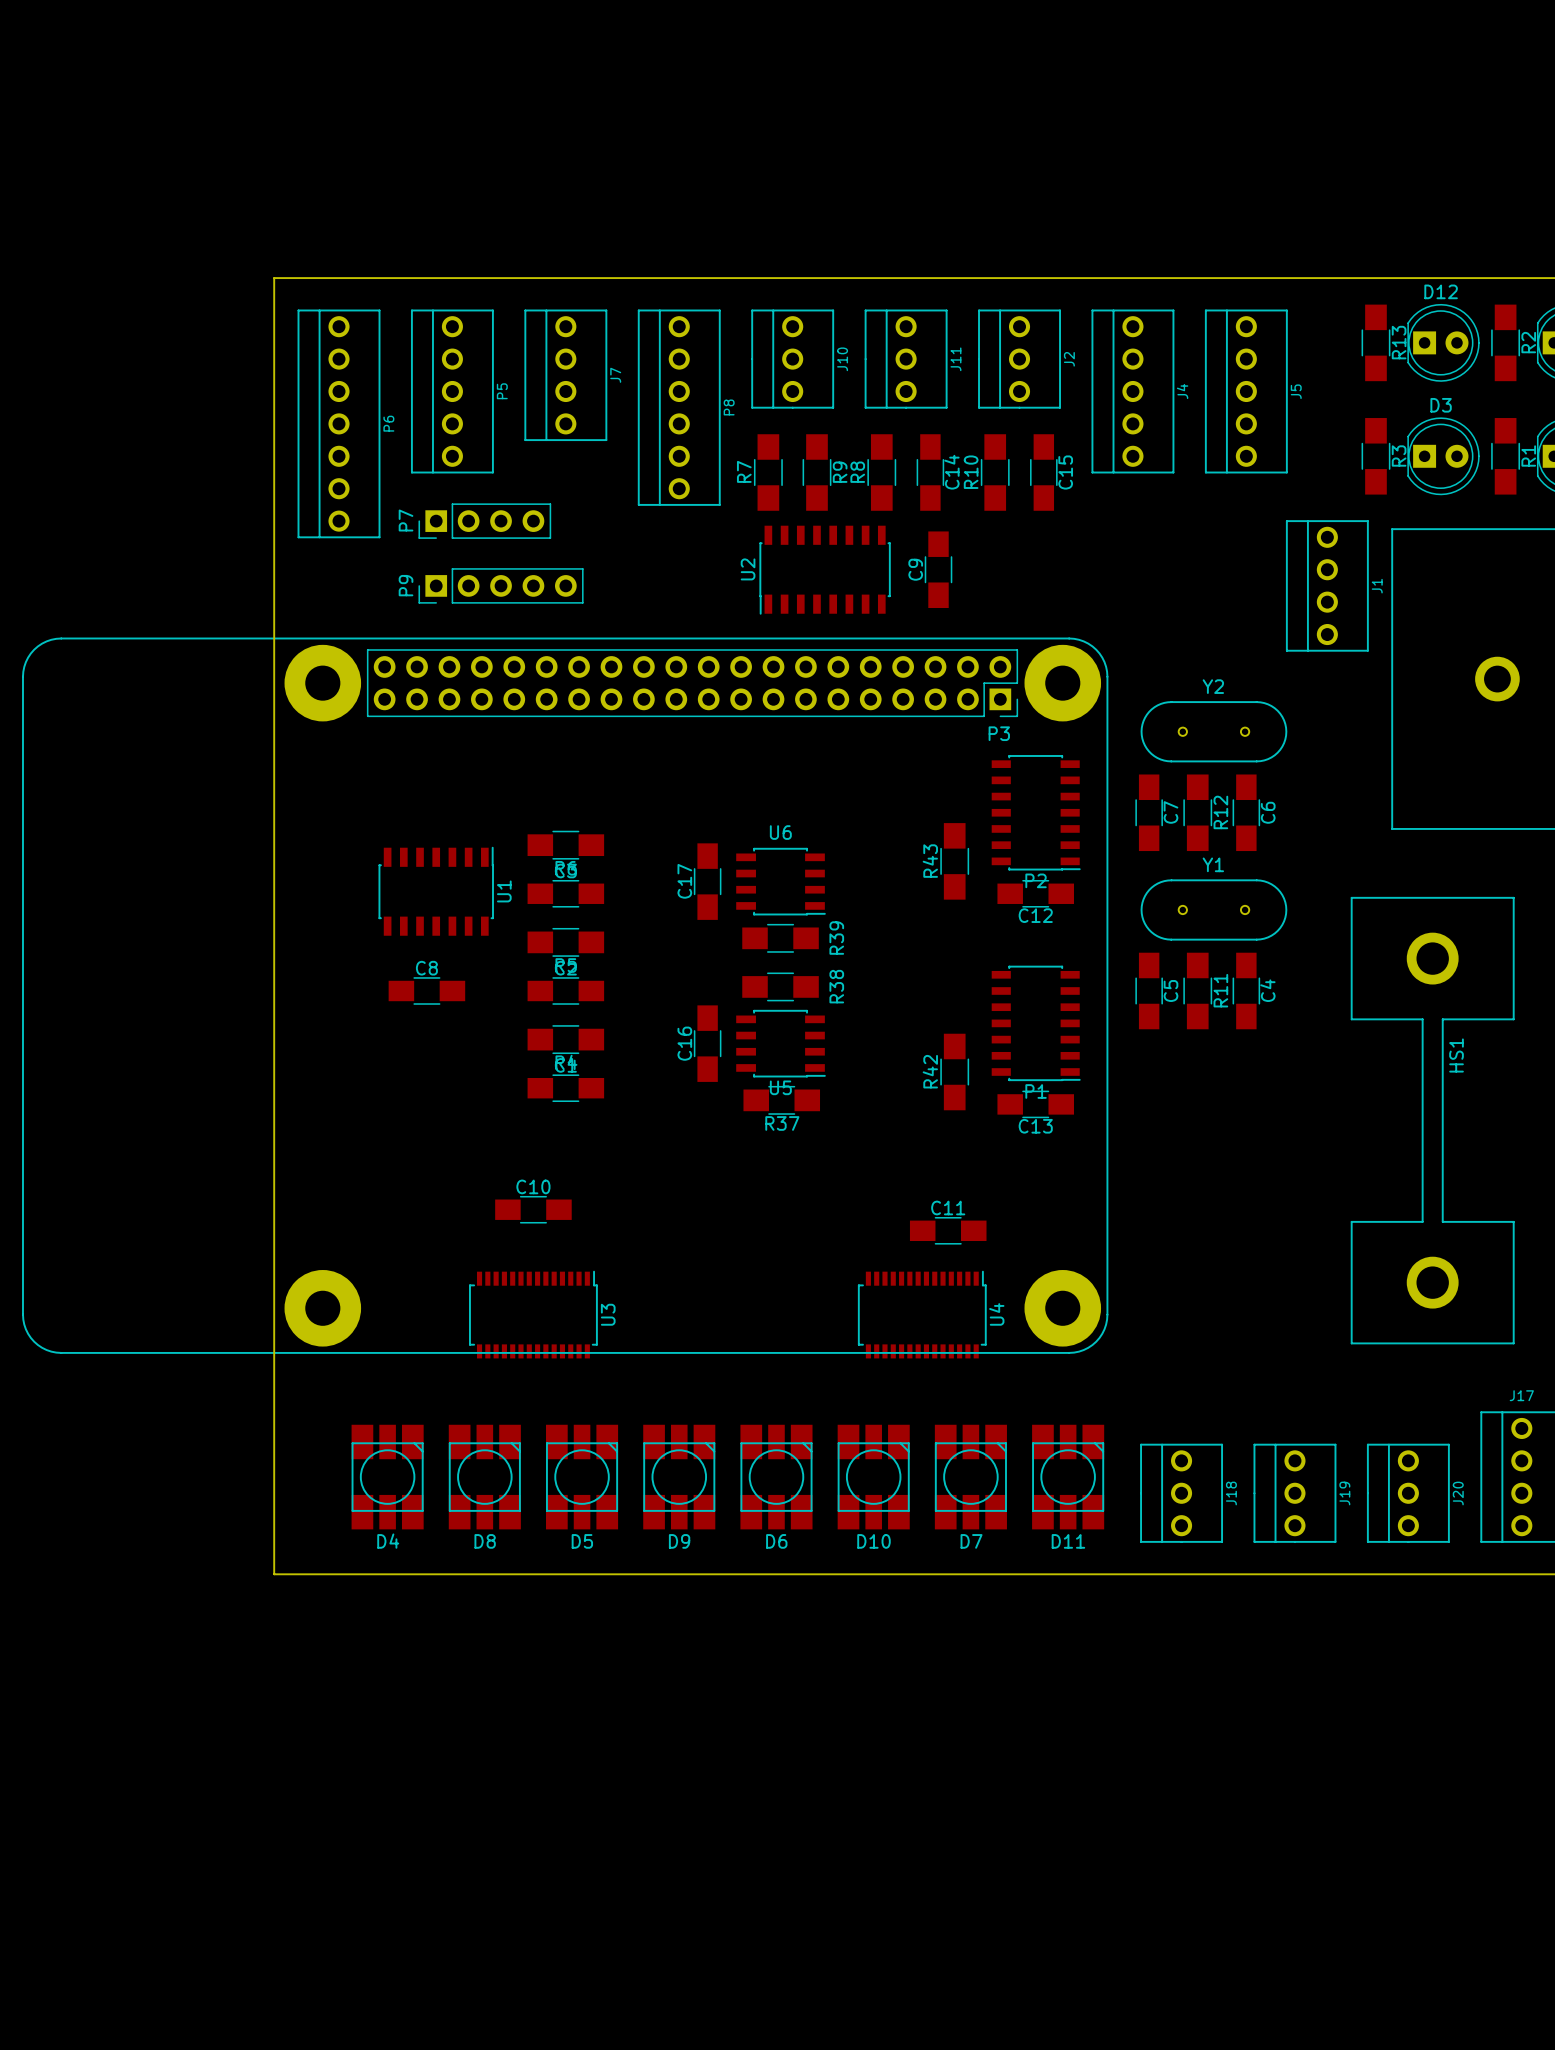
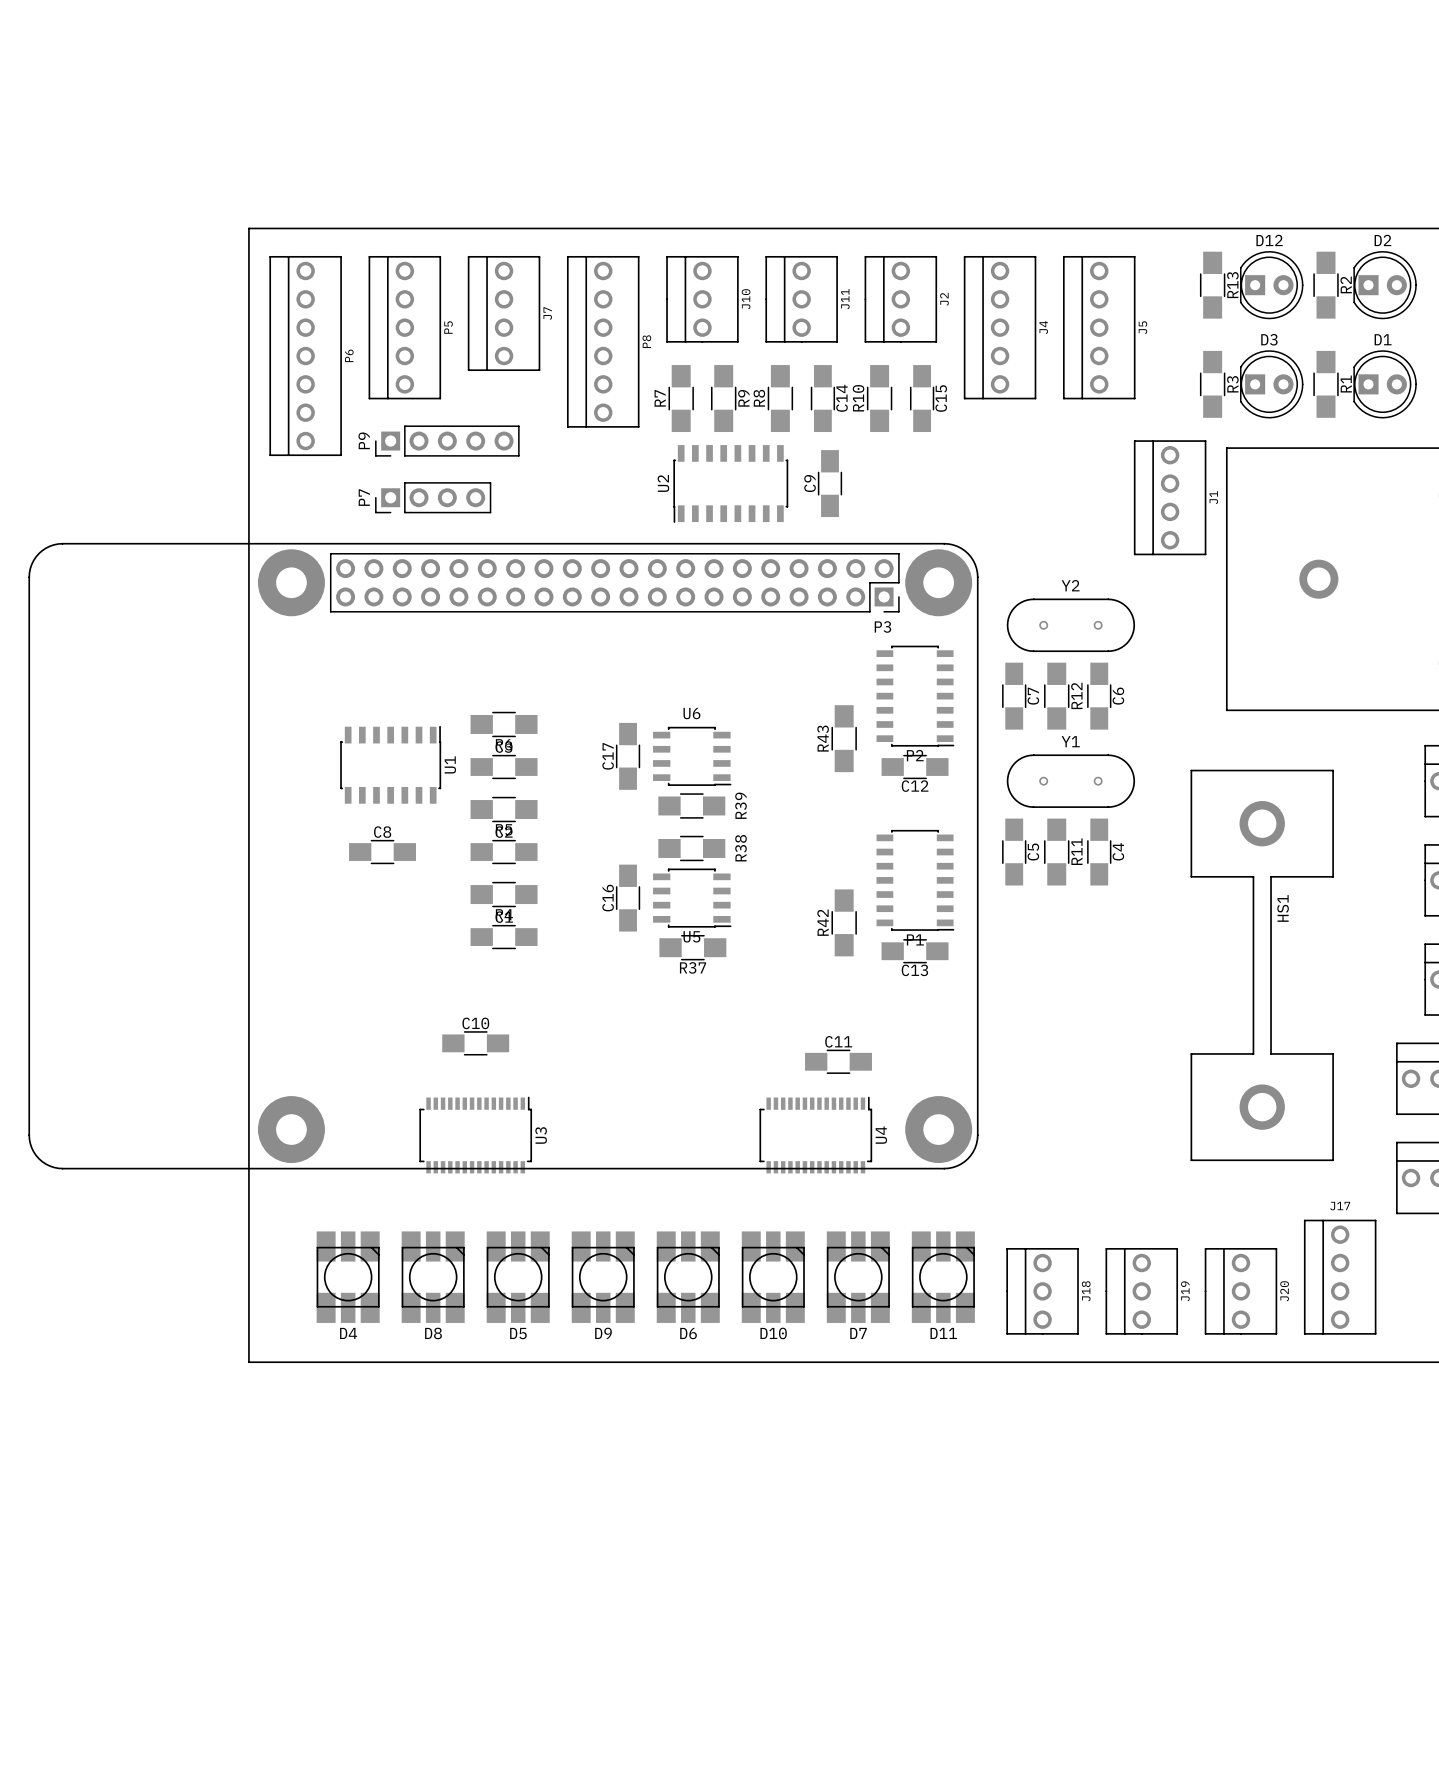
P7 position: (484, 521) -> (433, 497)
P9 position: (501, 585) -> (447, 441)

